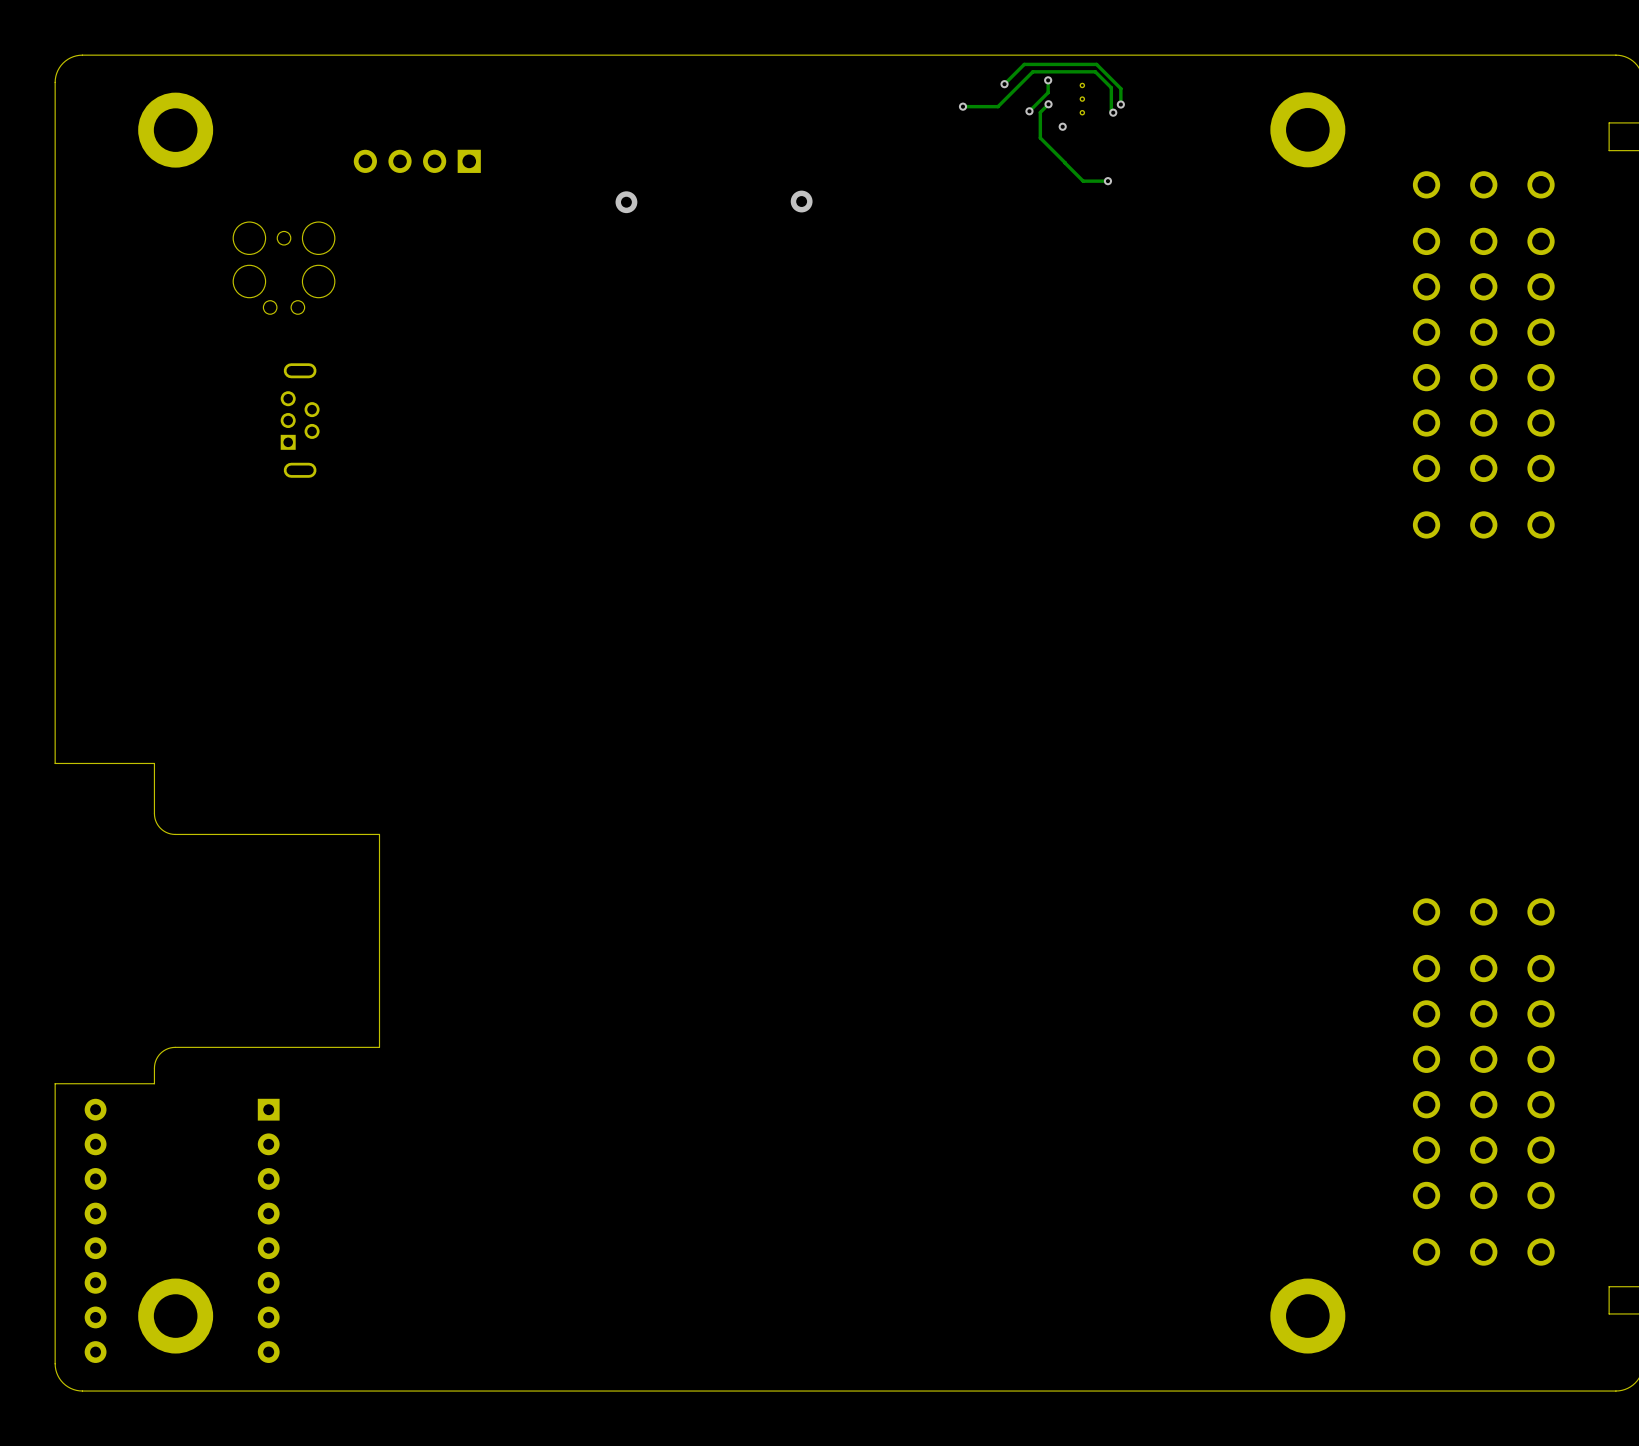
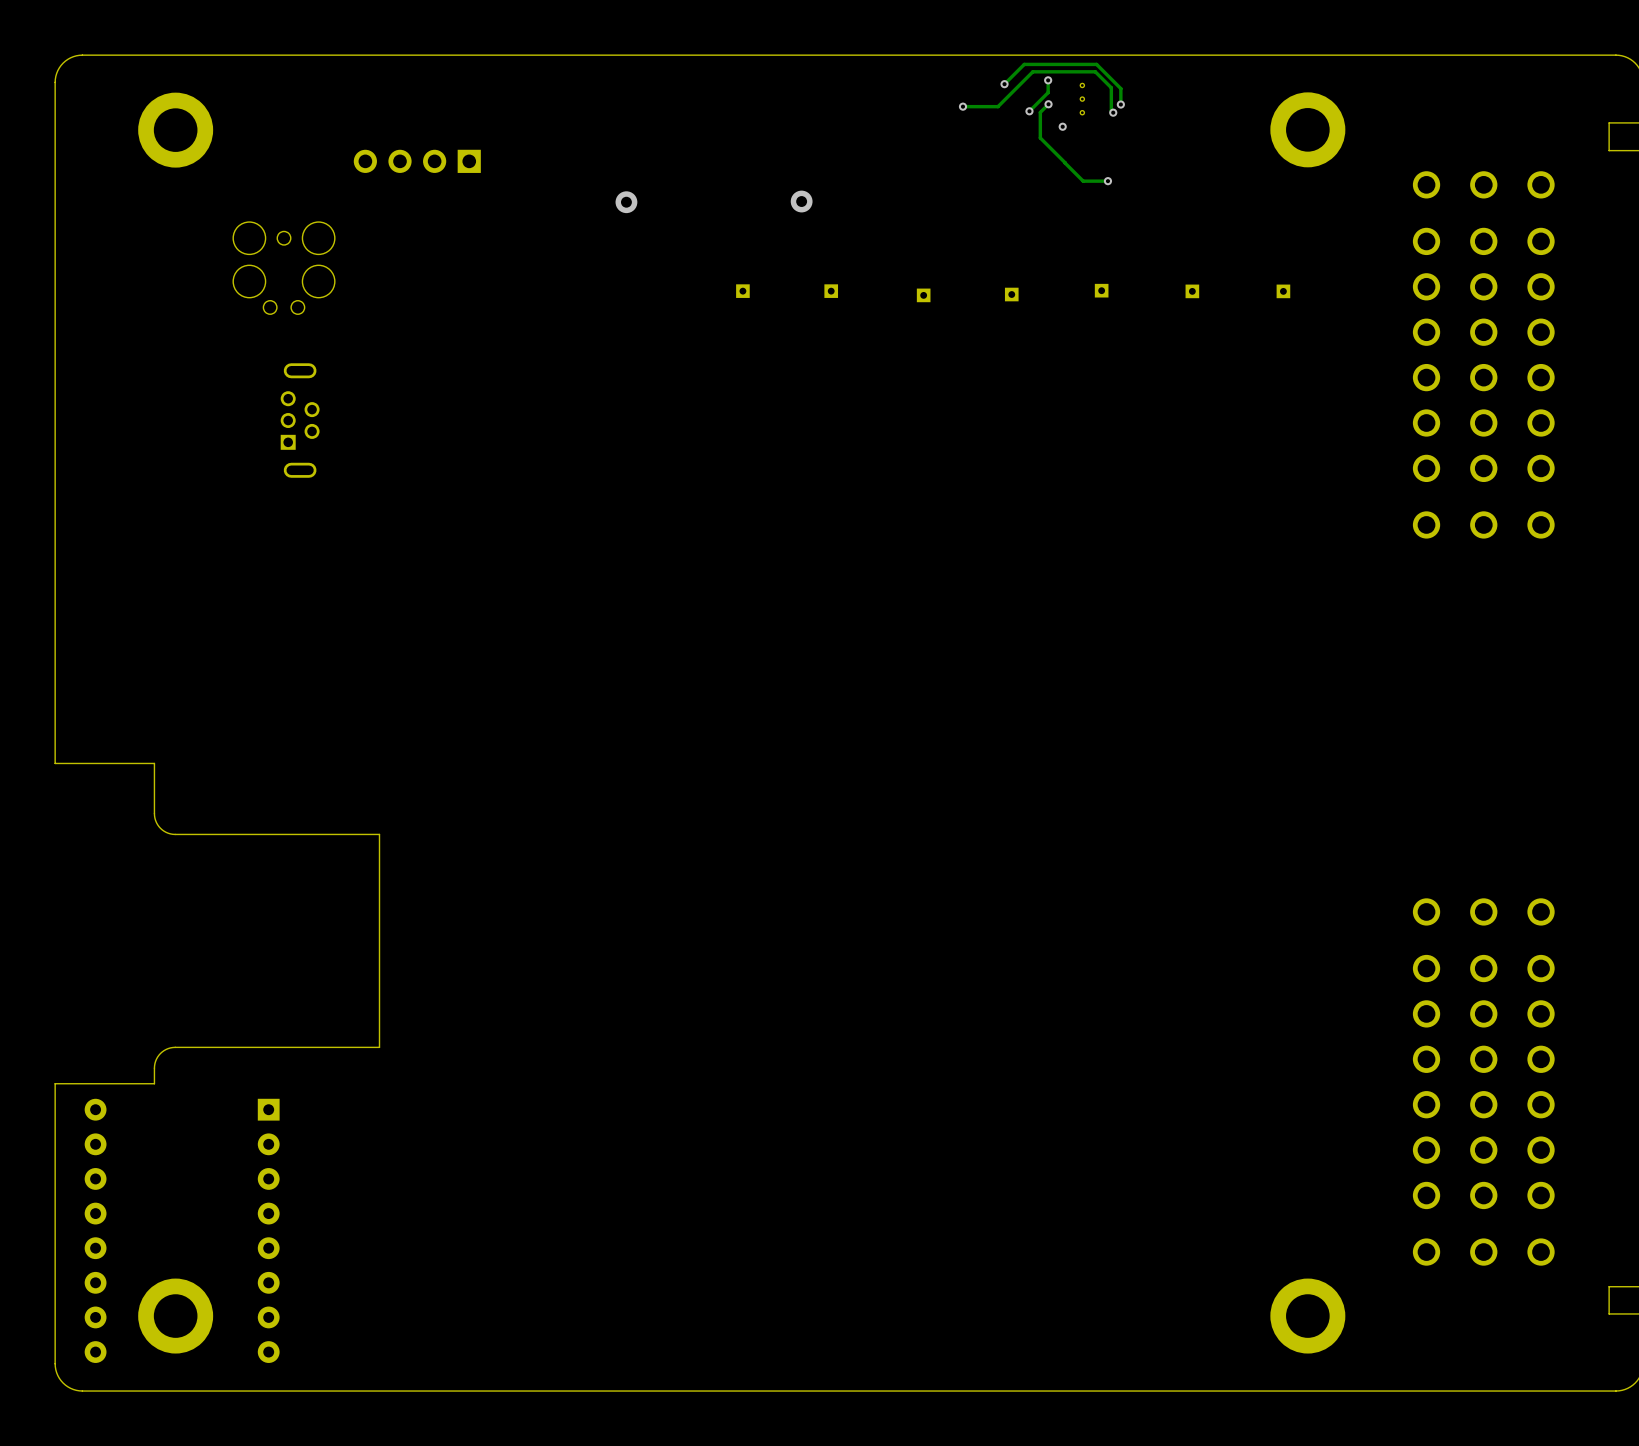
part: none -> (1101, 290)
part: none -> (742, 291)
part: none -> (831, 291)
part: none -> (1192, 291)
part: none -> (1283, 291)
part: none -> (1011, 294)
part: none -> (923, 295)

